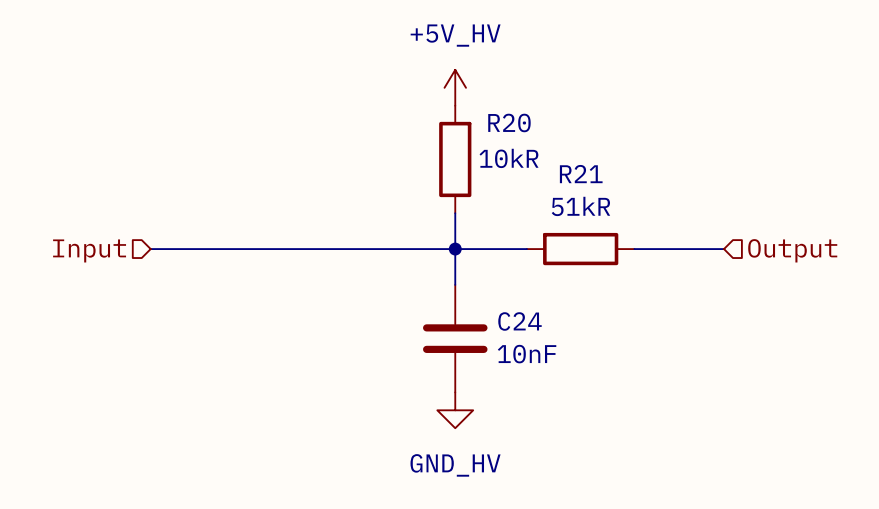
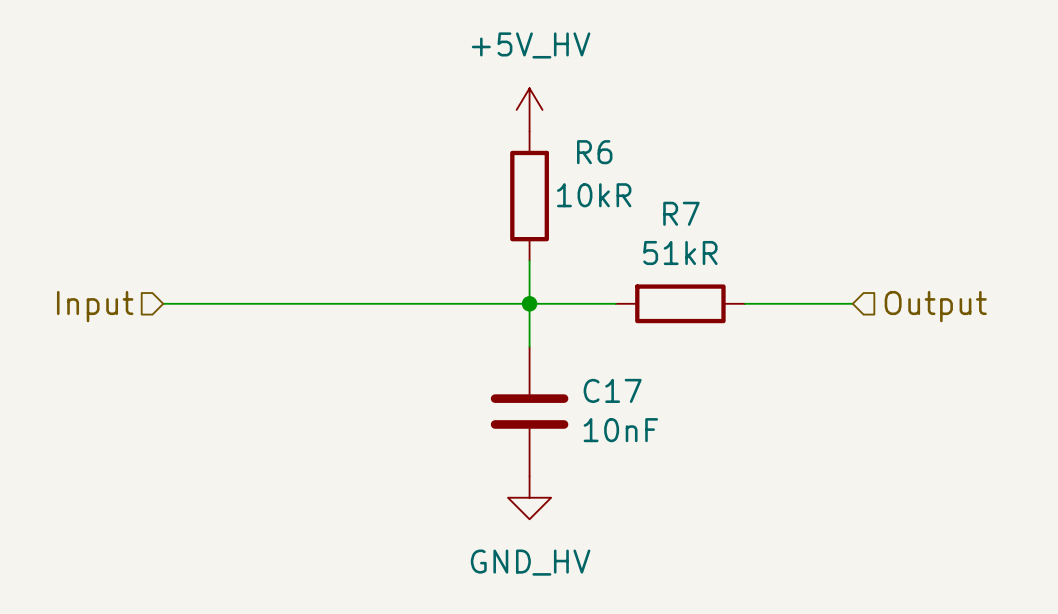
R20 name: R20 (509, 122) -> R6 (594, 152)
R21 name: R21 (581, 174) -> R7 (681, 213)
C24 name: C24 (519, 321) -> C17 (612, 390)

